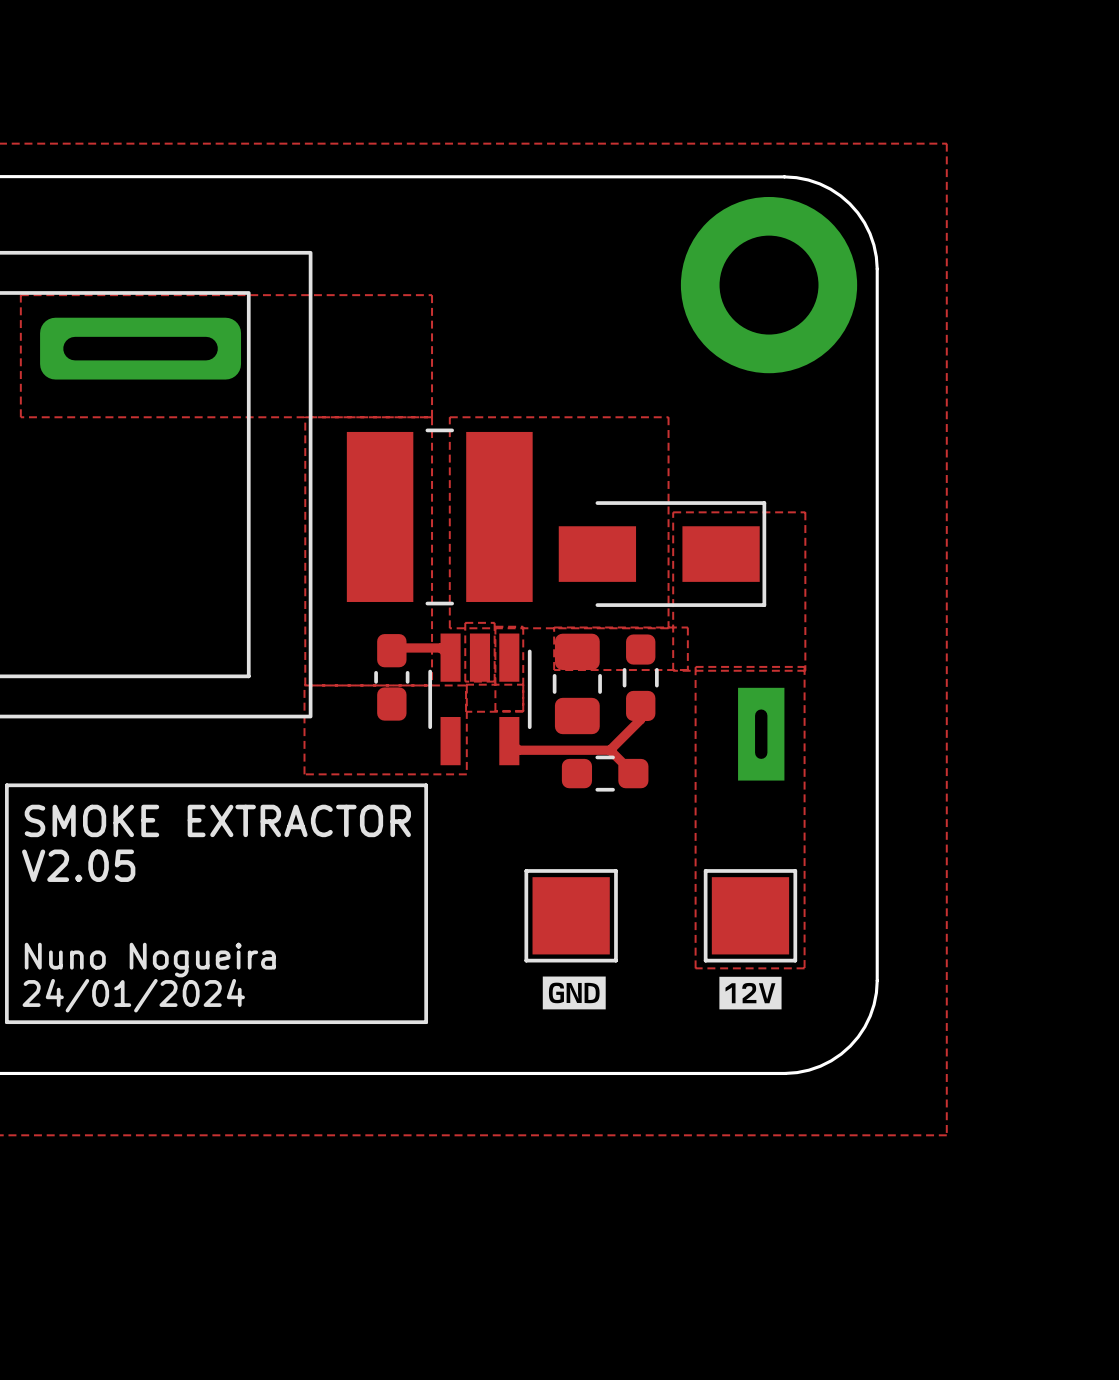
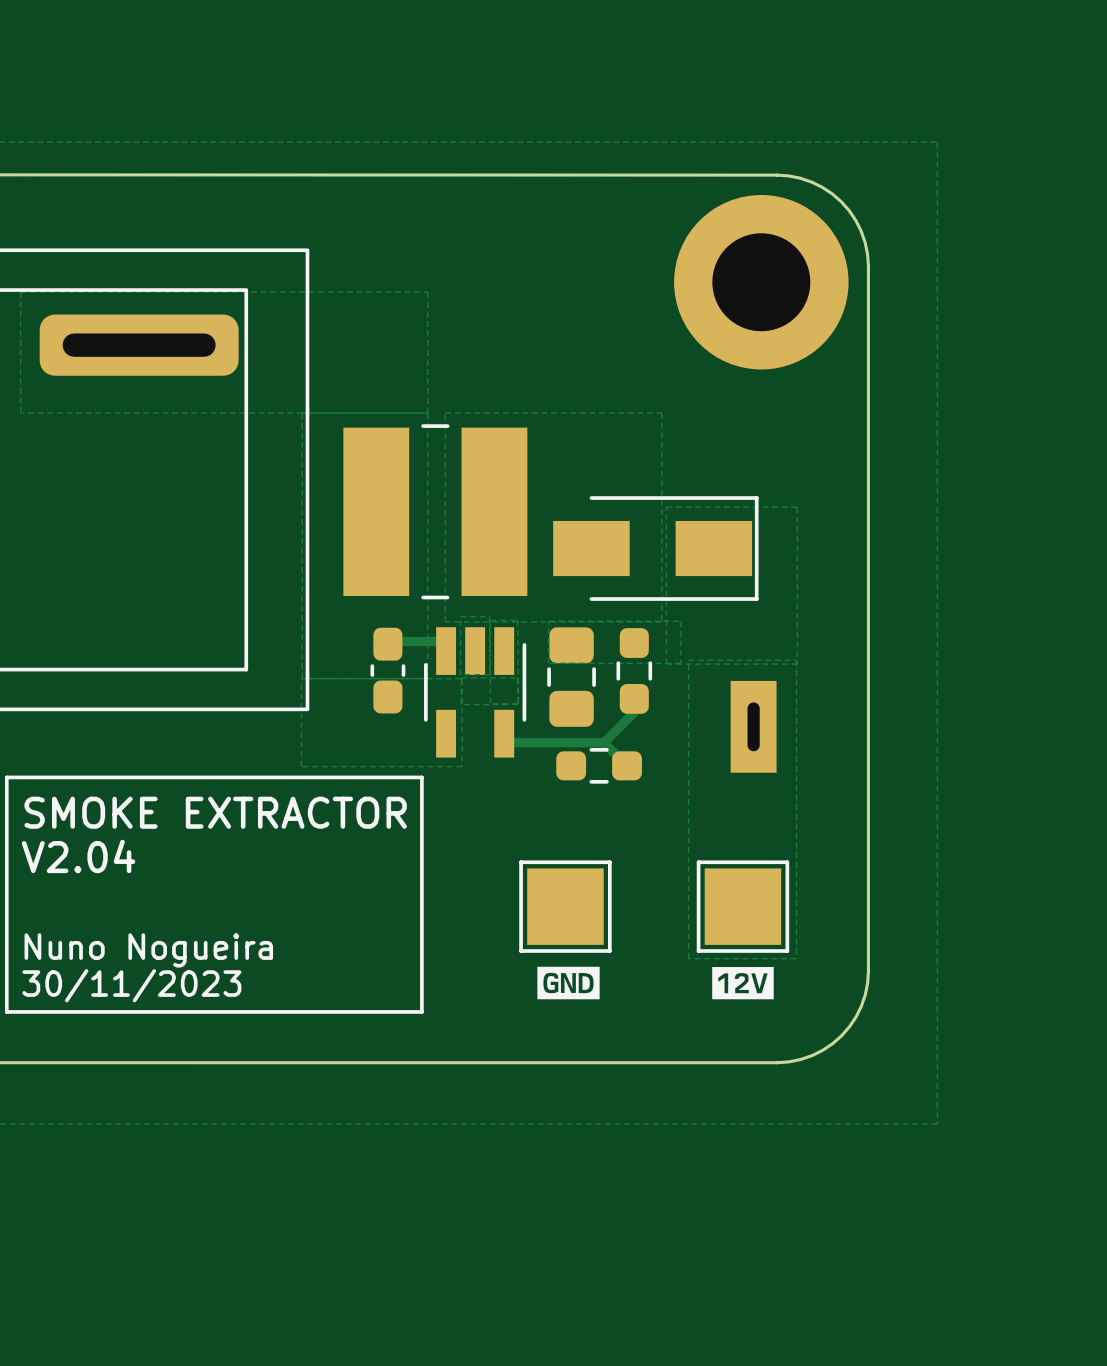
text: V2.05 (78, 865) -> V2.04 (78, 856)
text: 24/01/2024 (133, 995) -> 30/11/2023 (131, 985)

